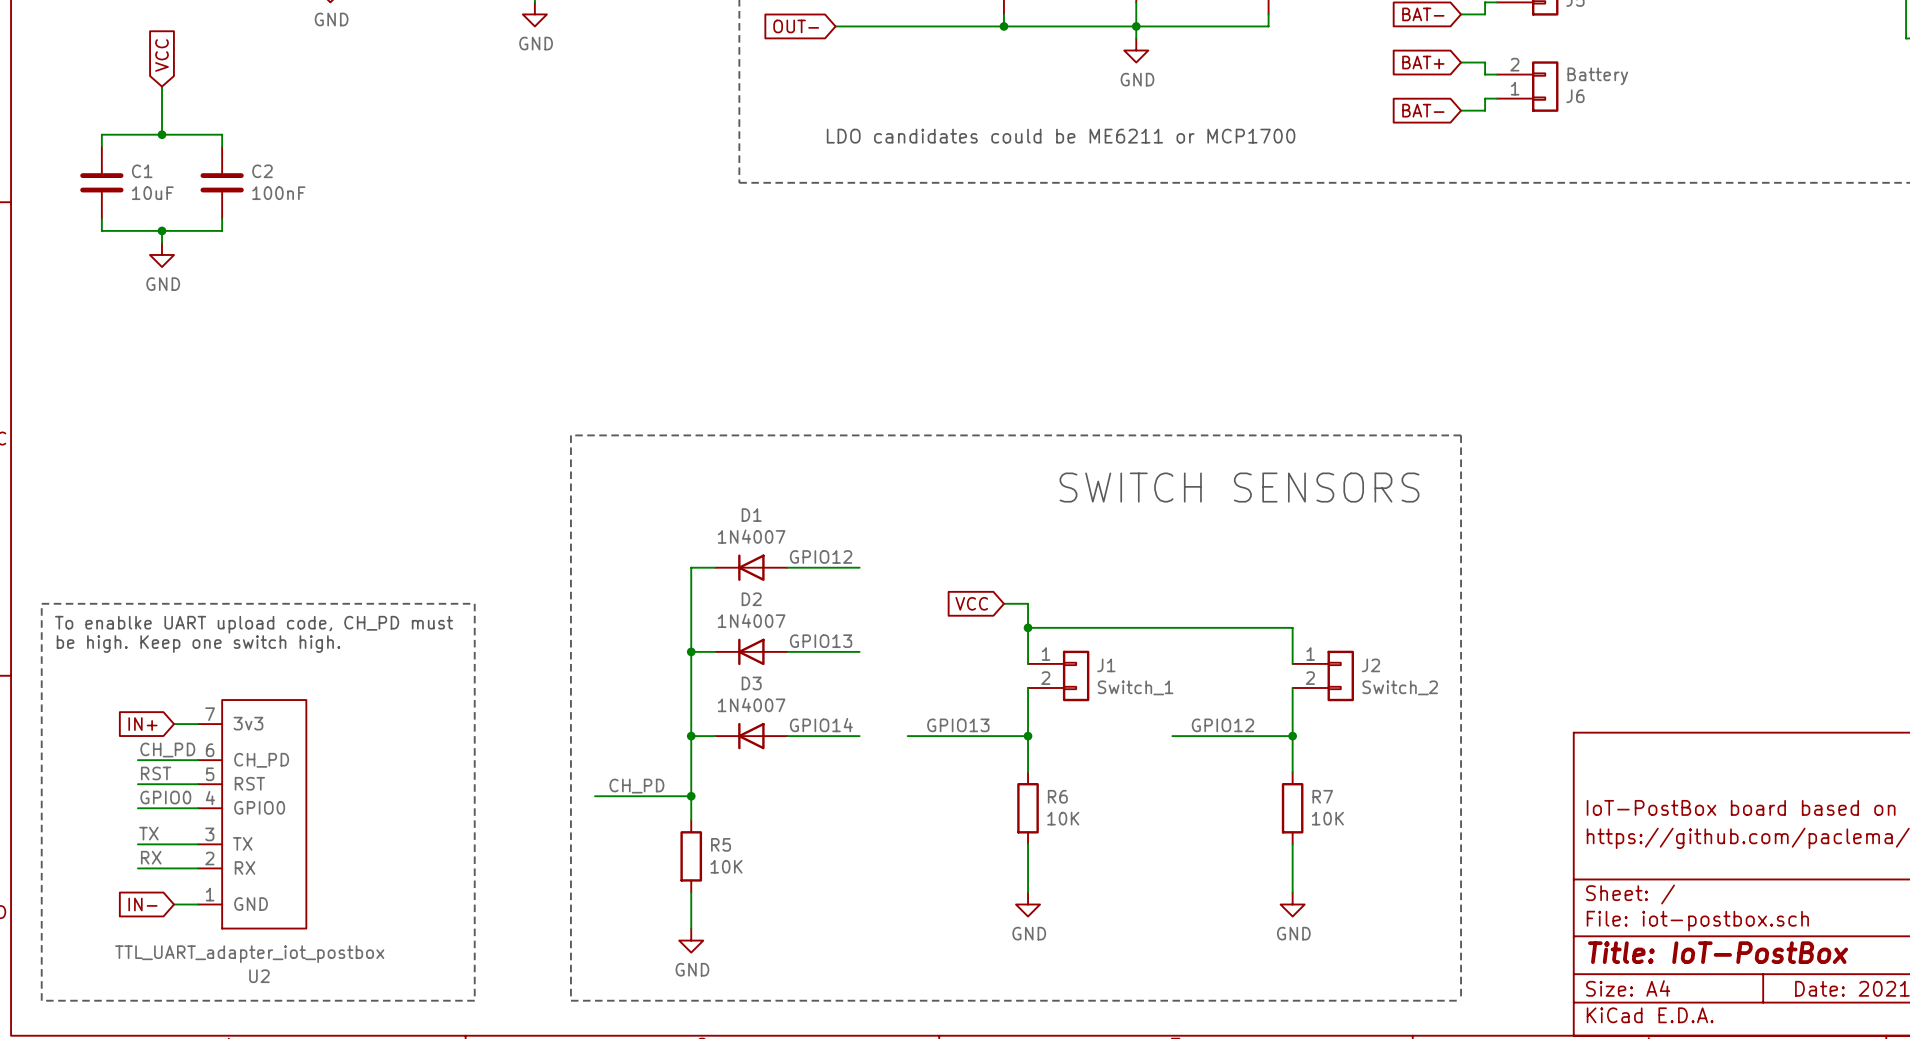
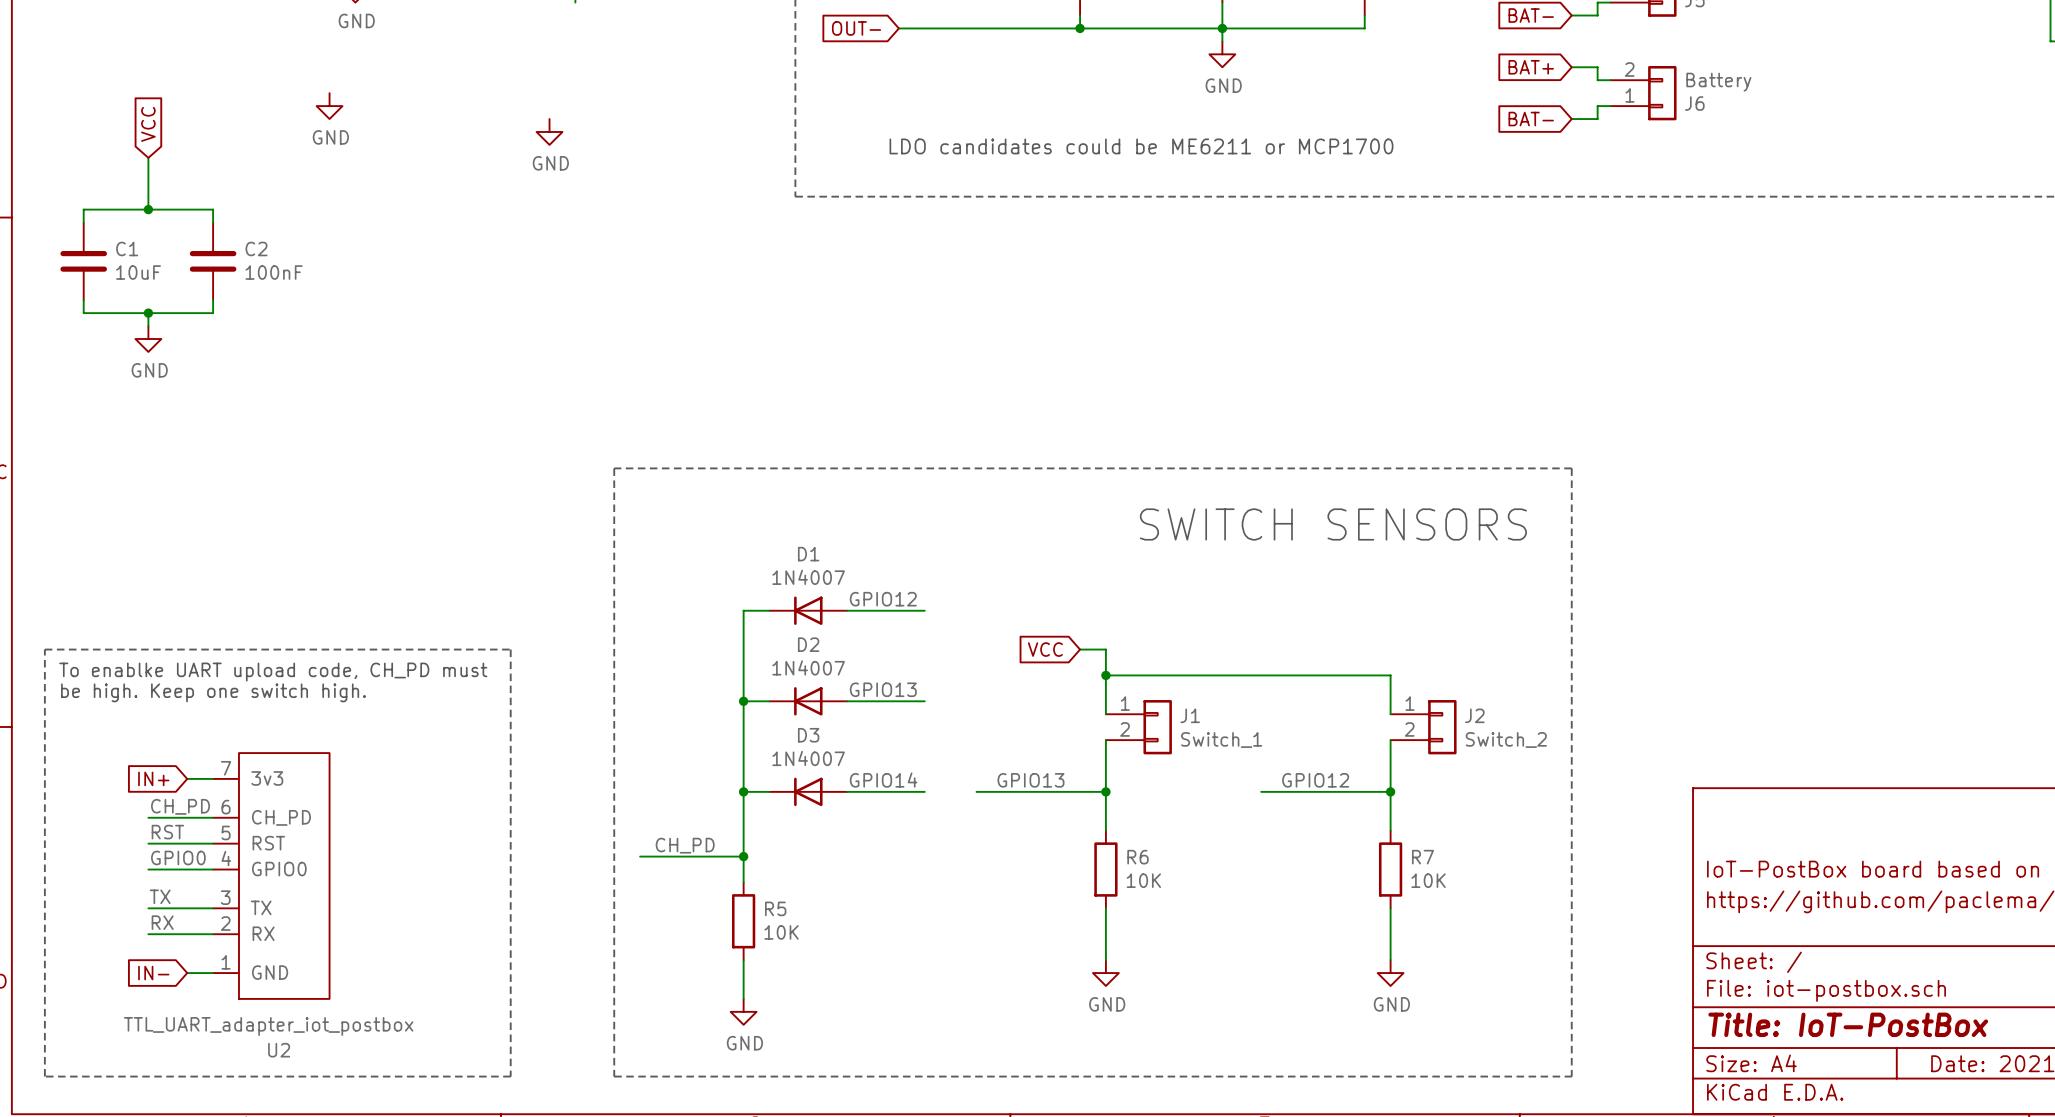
power symbol position: GND (534, 14) -> GND (549, 131)
global label position: VCC (162, 55) -> VCC (148, 124)
wire: (162, 86) (162, 134) -> (148, 157) (148, 209)
power symbol: none -> GND (329, 106)
junction: (162, 134) -> none
wire: (101, 146) (101, 134) (222, 134) (222, 146) -> (83, 222) (83, 209) (213, 209) (213, 222)
C1 position: (101, 182) -> (83, 261)
C2 position: (222, 182) -> (213, 261)
junction: none -> (148, 209)
wire: (101, 218) (101, 230) (222, 230) (222, 218) -> (83, 300) (83, 313) (213, 313) (213, 300)
wire: (162, 230) (162, 242) -> (148, 313) (148, 326)
junction: (162, 230) -> none
power symbol position: GND (162, 254) -> GND (148, 339)
junction: none -> (148, 313)

